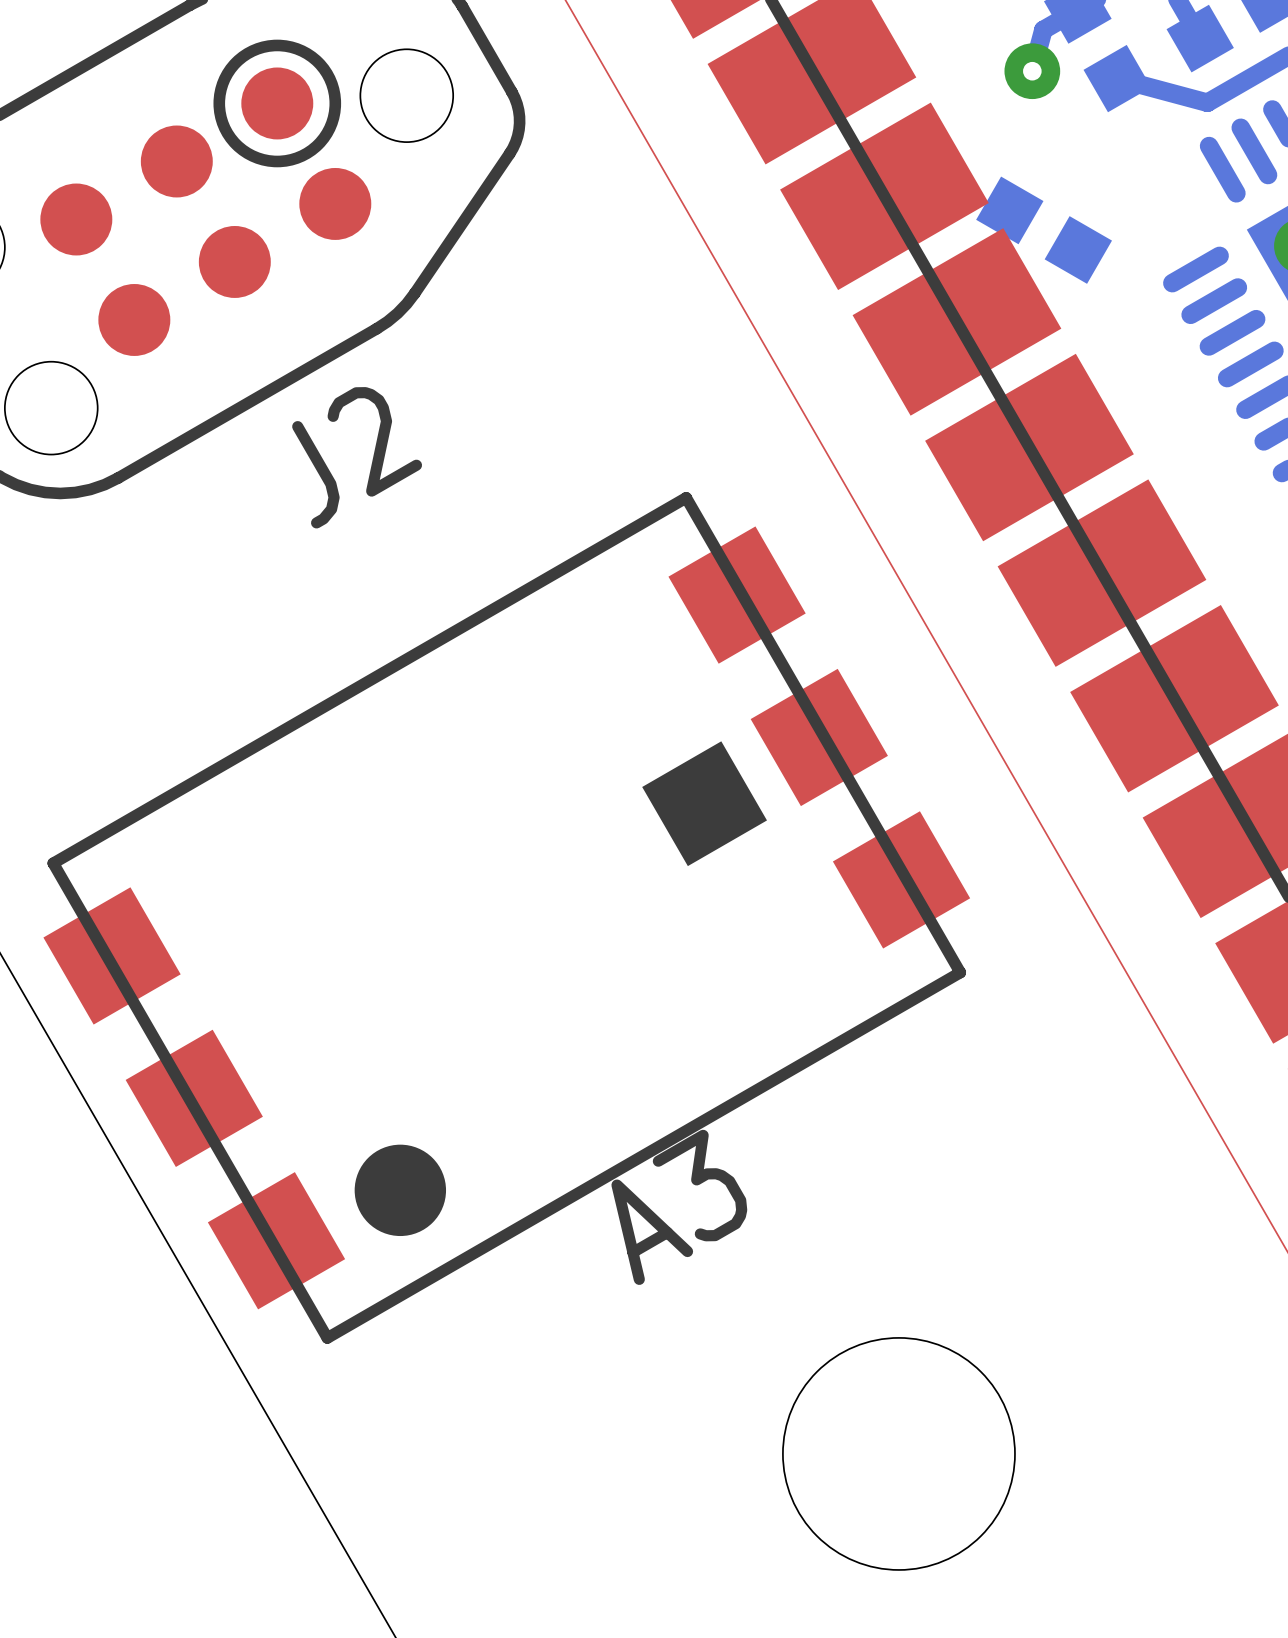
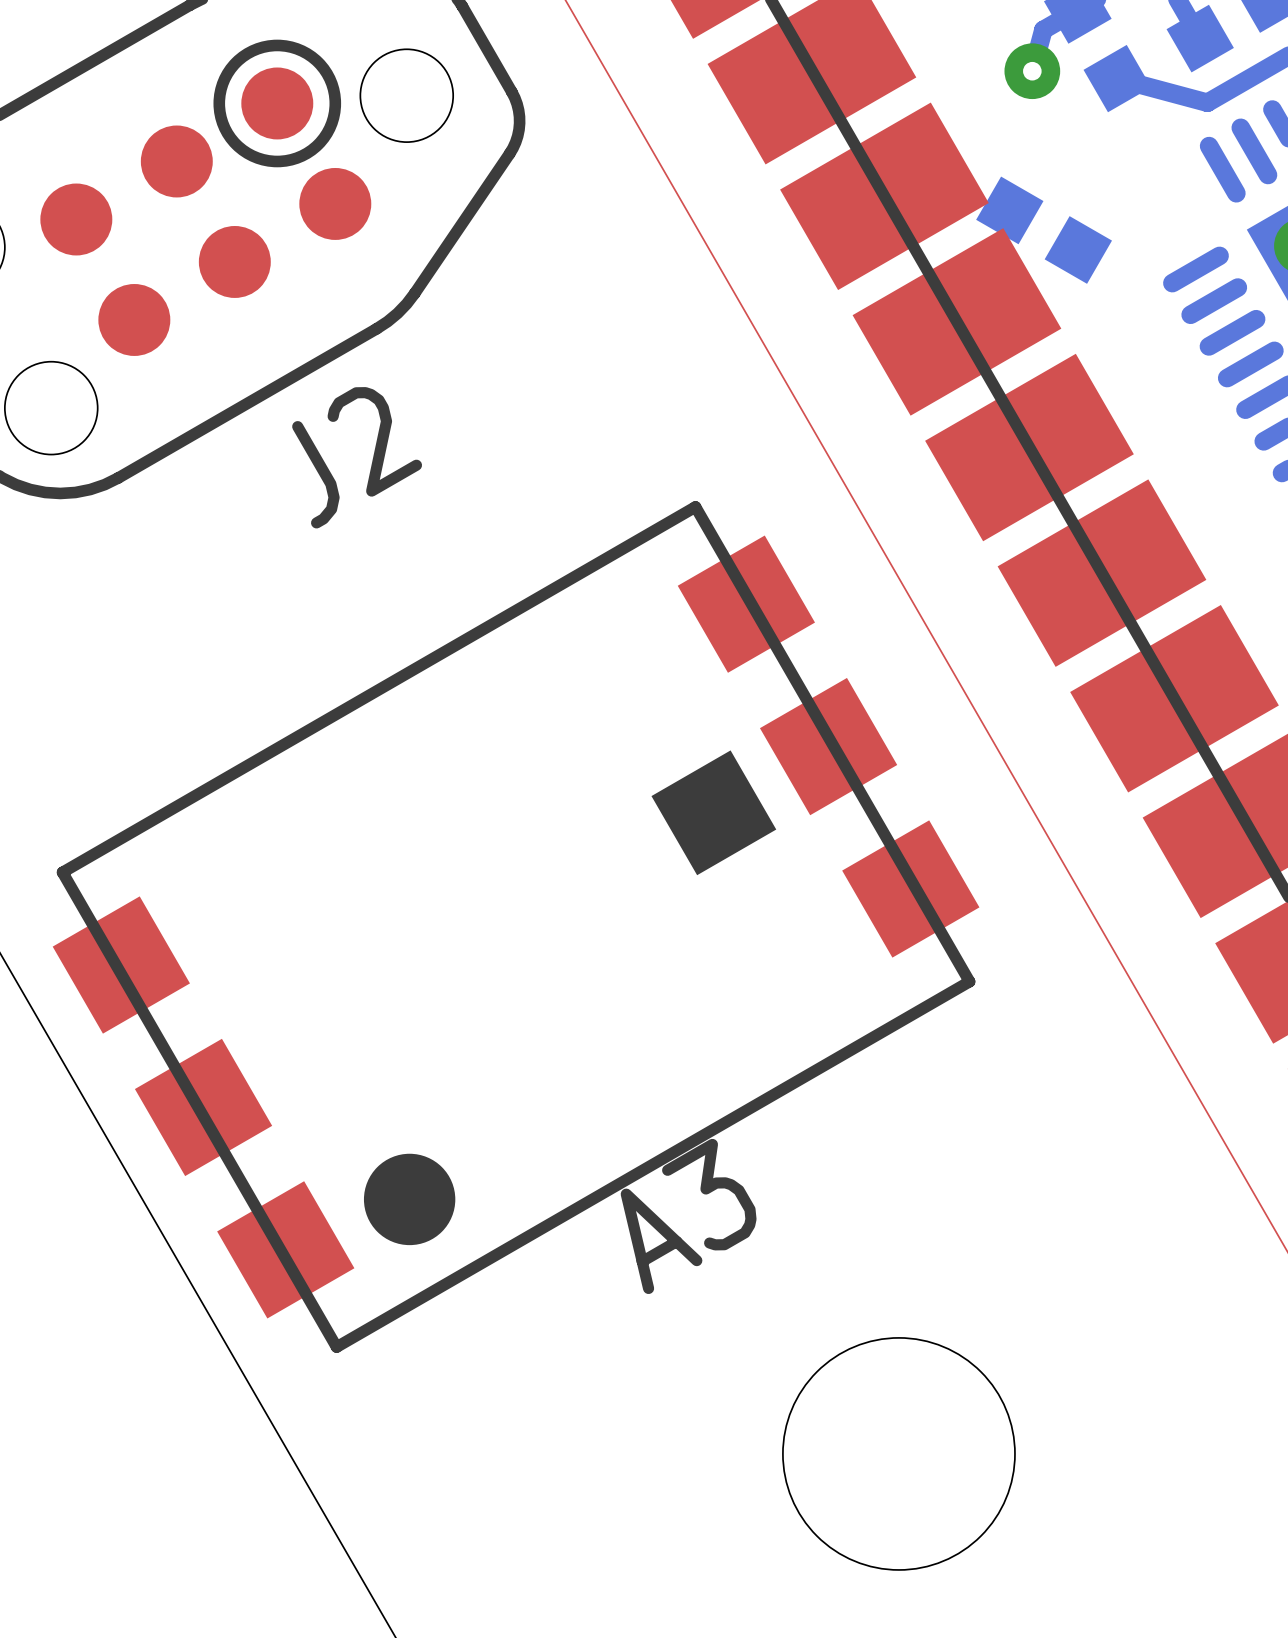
A3 position: (506, 917) -> (516, 927)

